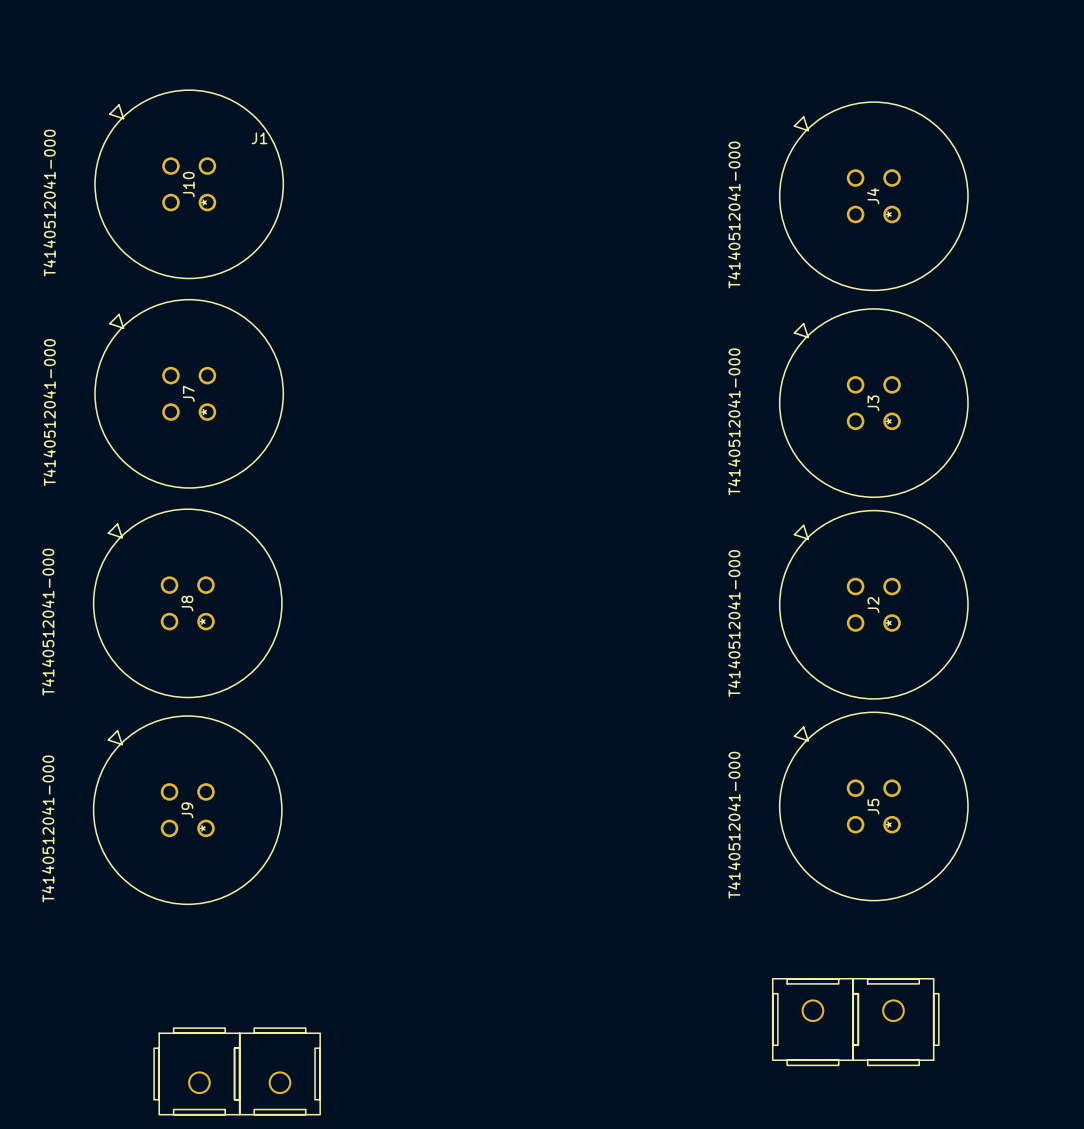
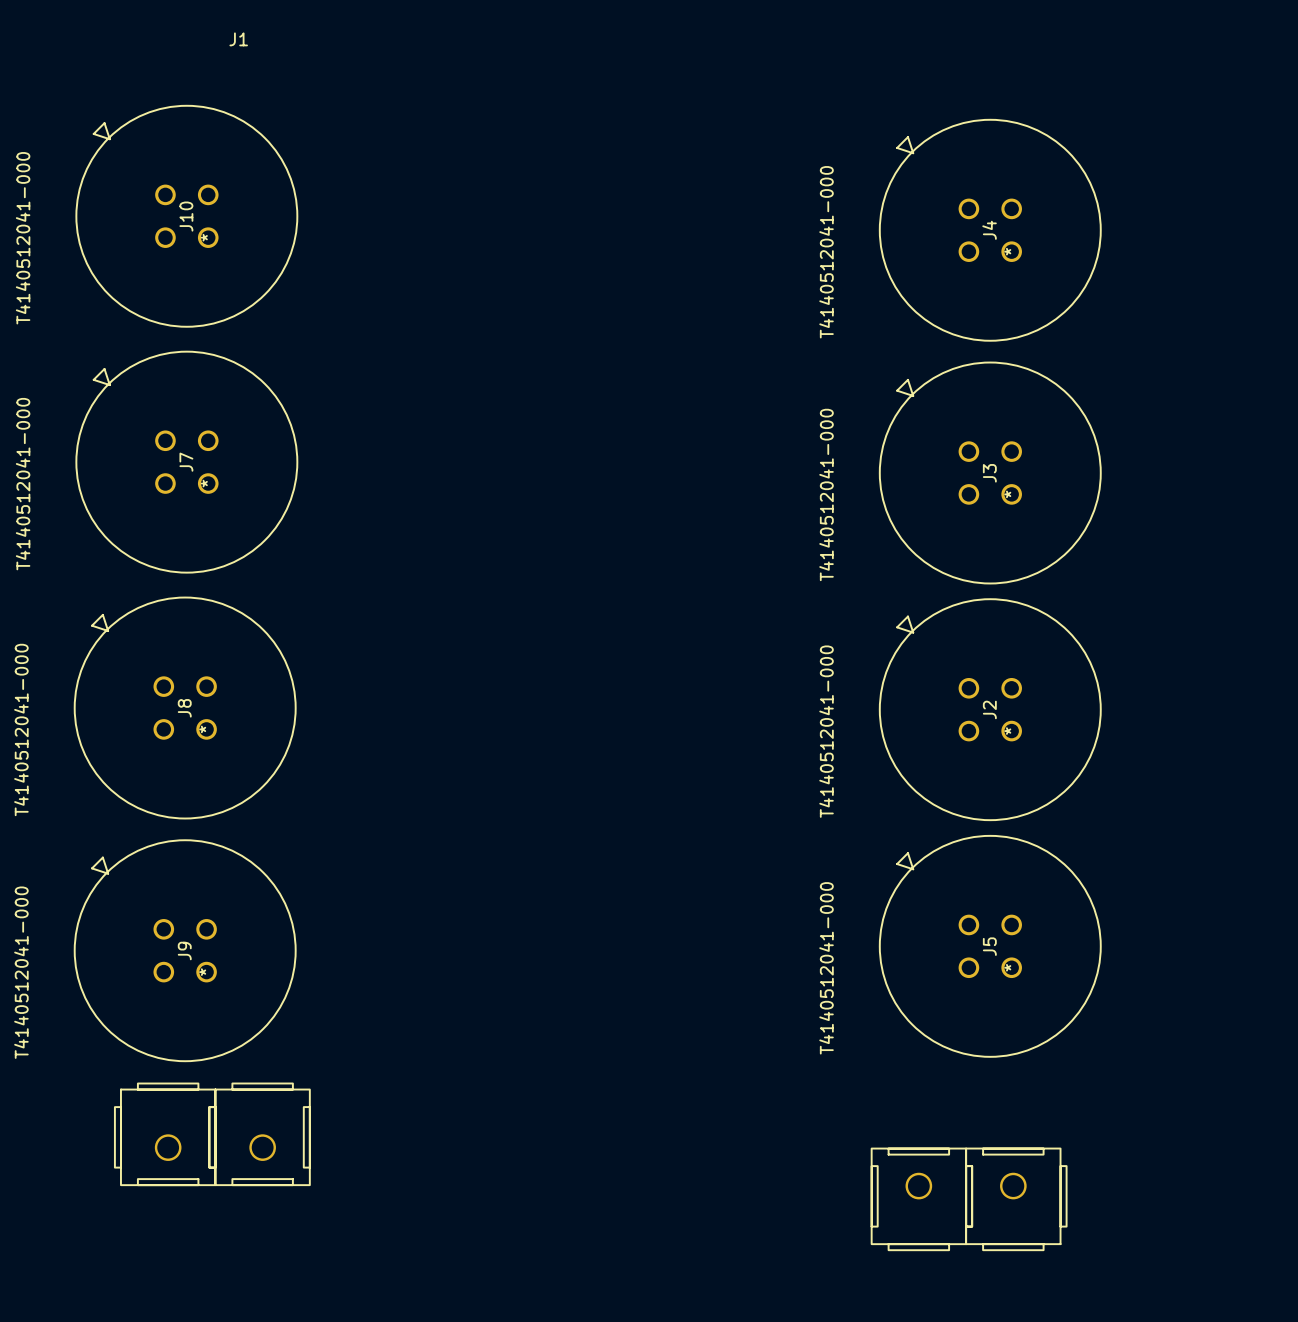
J1 position: (237, 1071) -> (212, 1134)

